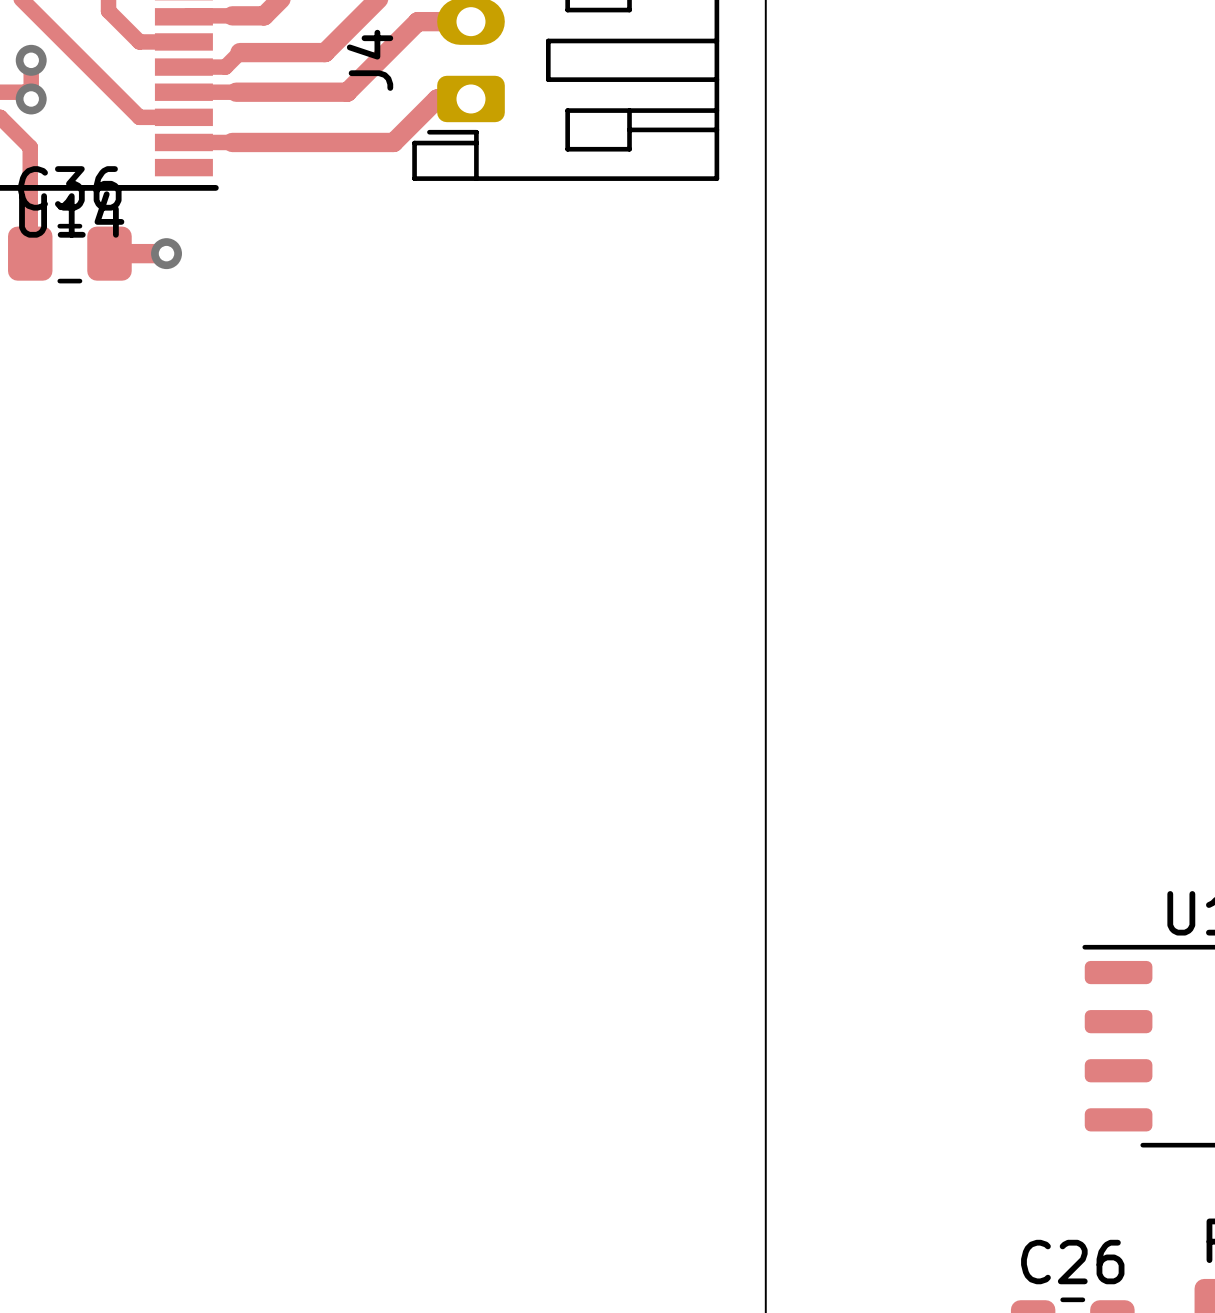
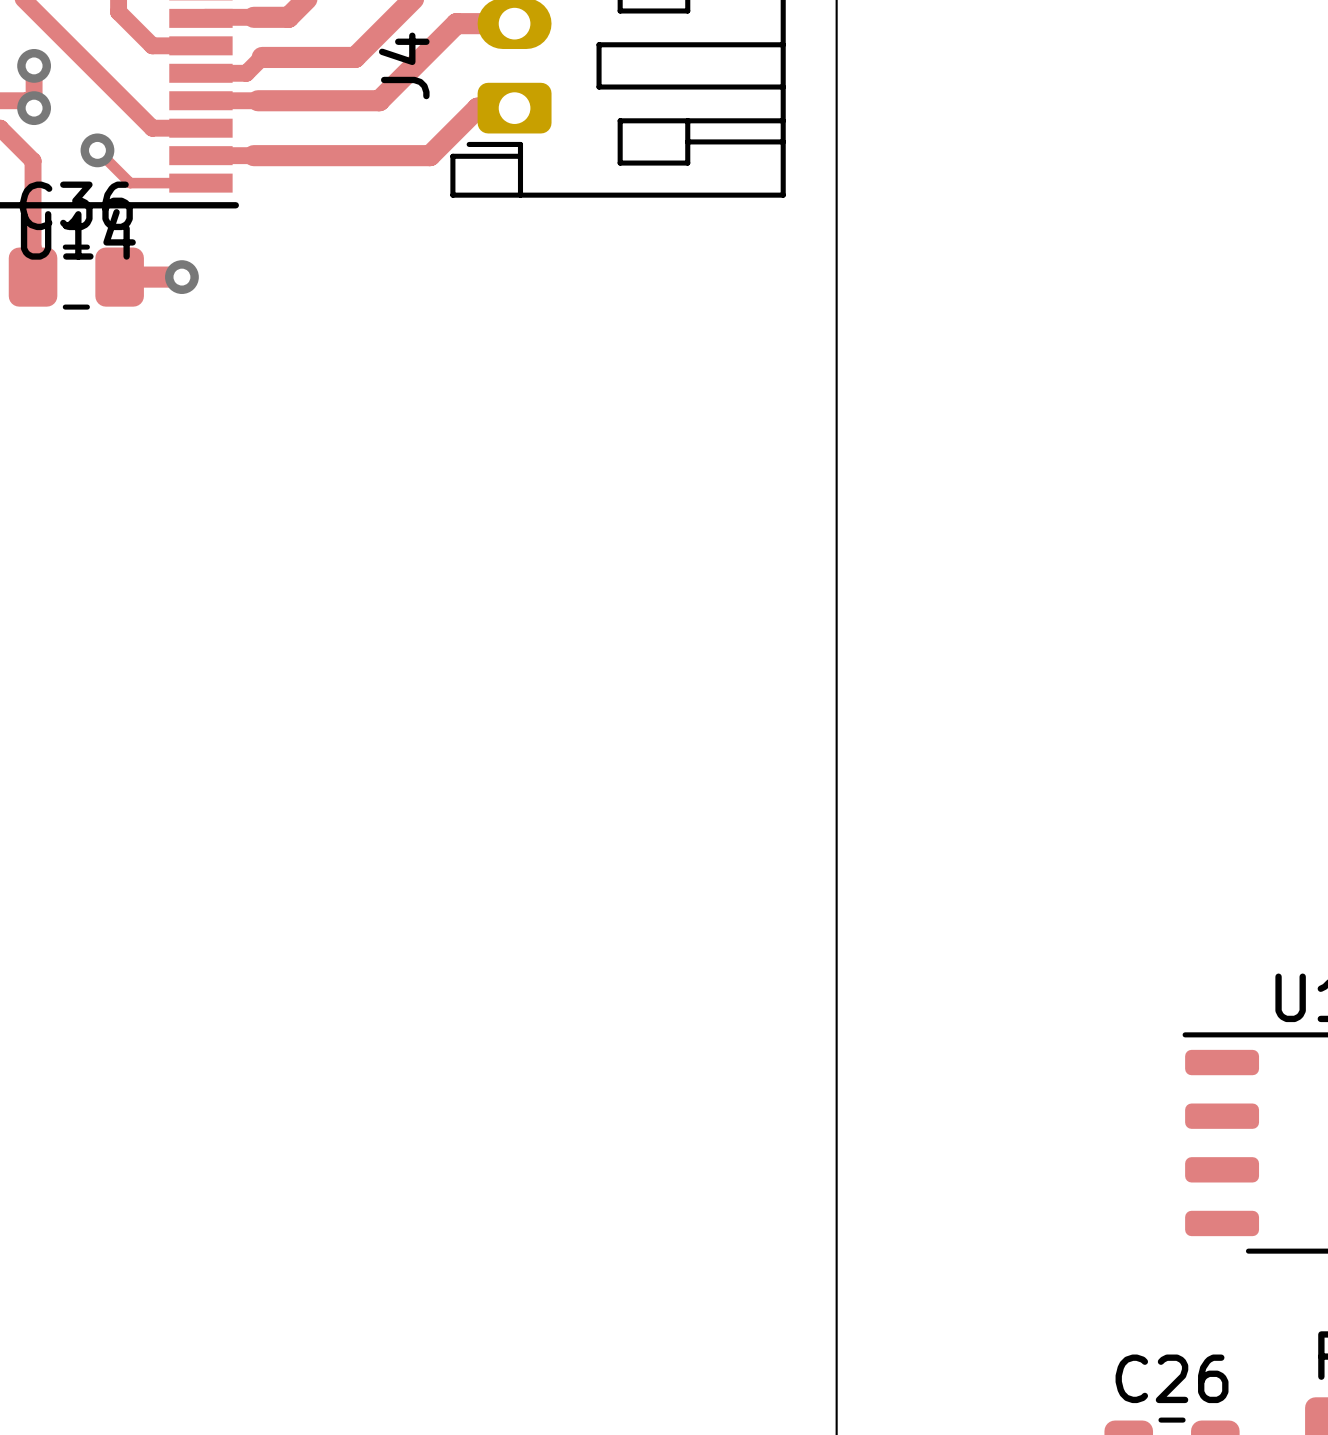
track: none -> (97, 150) (130, 183) (200, 183)
via: none -> (97, 150)

